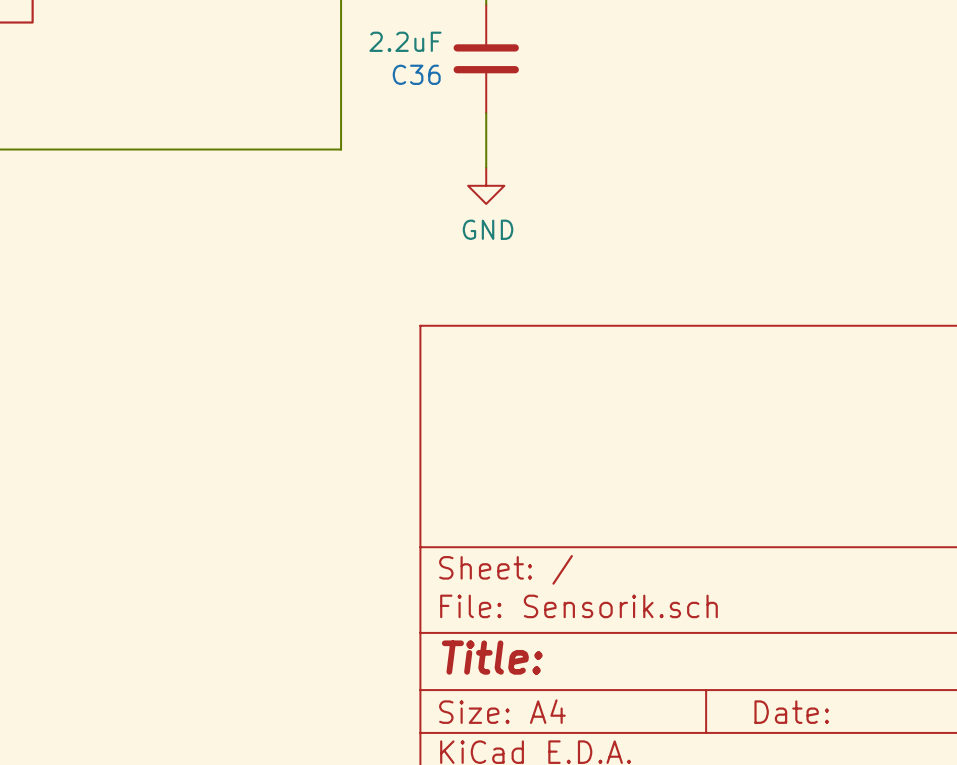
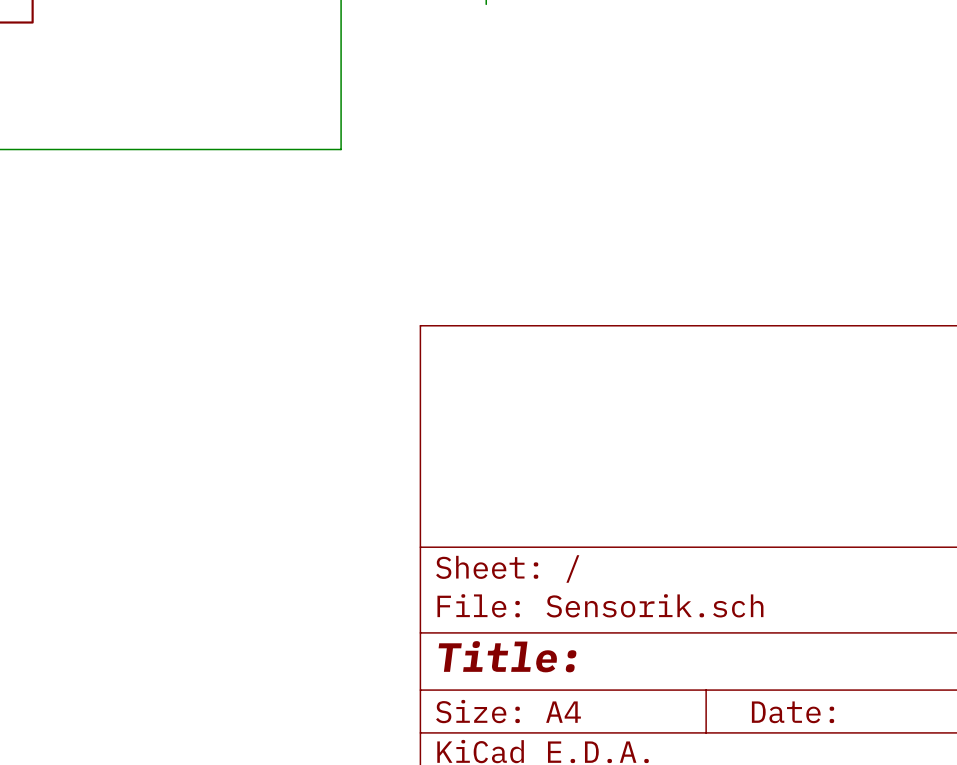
C36: 2.2uF (486, 58) -> none
wire: (486, 113) (486, 167) -> none
power symbol: GND (486, 185) -> none

